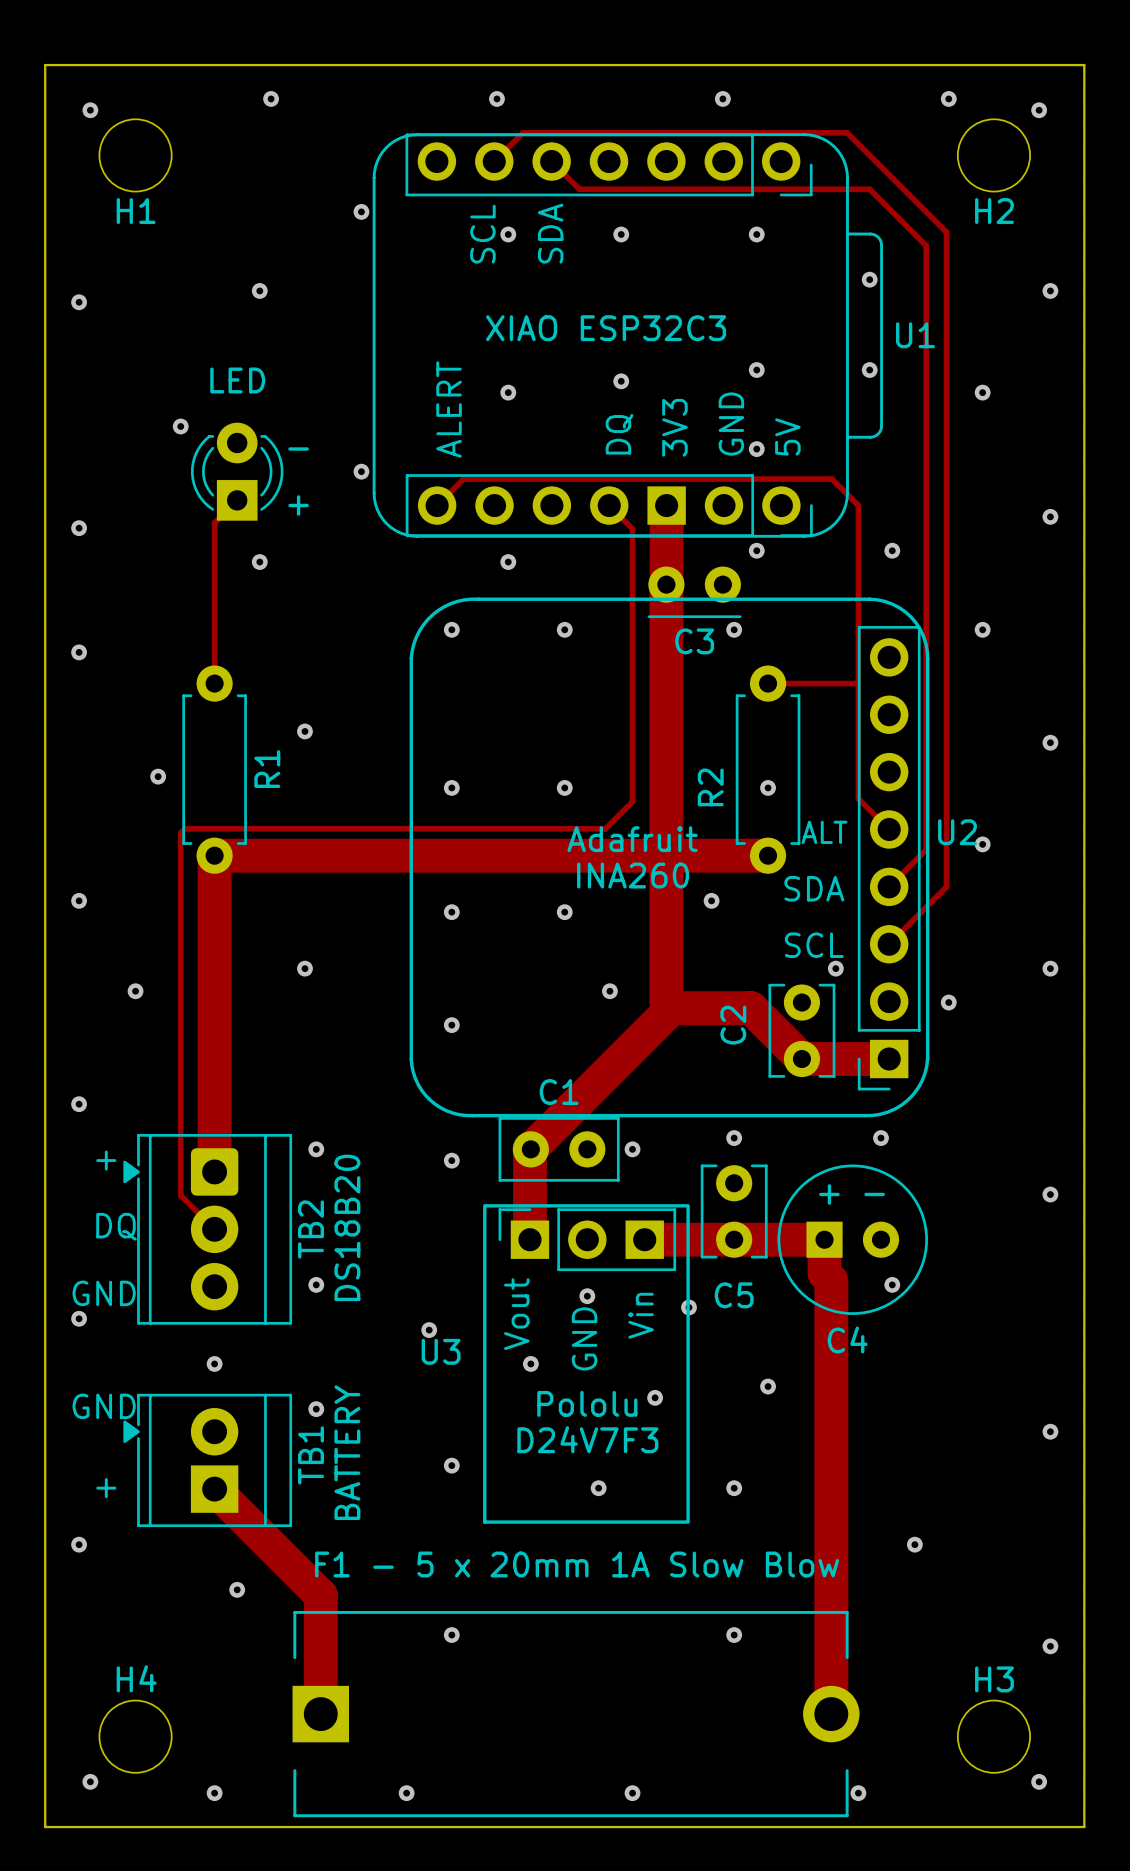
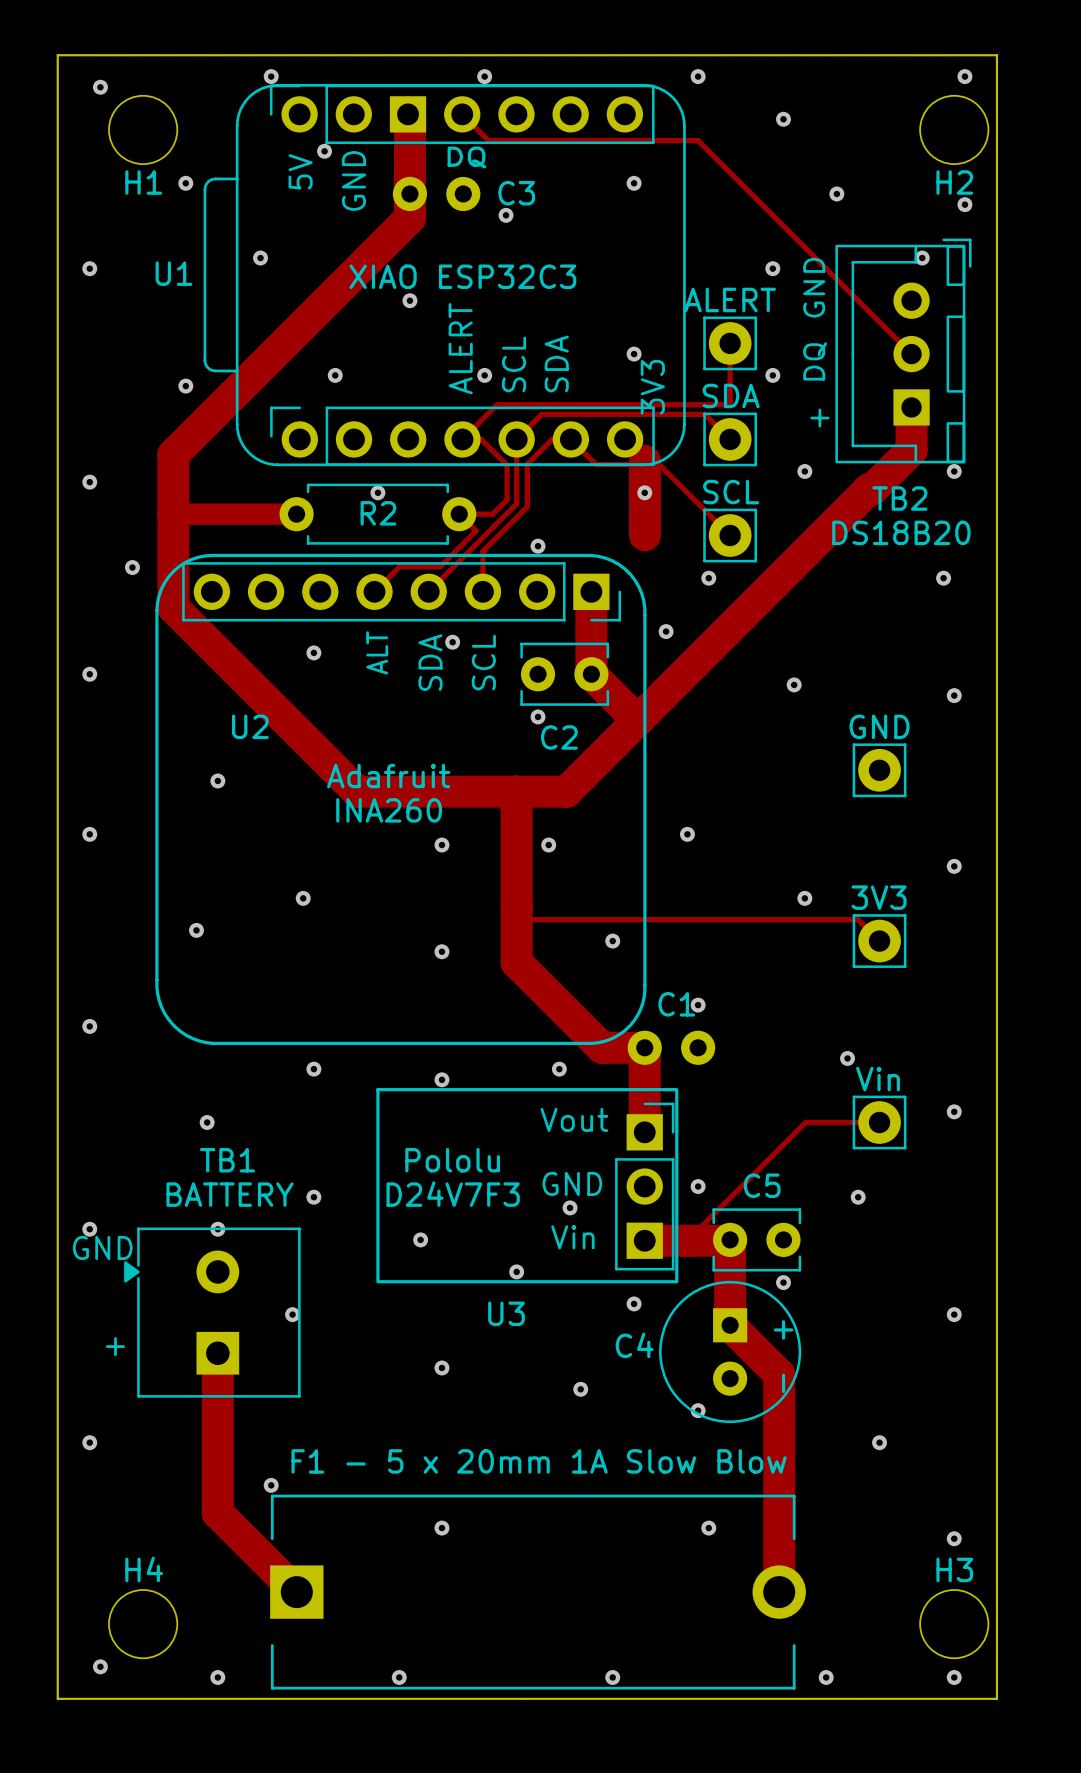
board edge: (45, 76) (45, 65) (1084, 65) (1084, 1827) (45, 1827) (45, 1815) -> (57, 55) (996, 55) (996, 1698) (57, 1698)
via: (948, 98) -> none
via: none -> (964, 76)
via: (1039, 110) -> none
U1 footprint: [372, 133, 884, 538] -> [203, 83, 686, 467]
track: none -> (462, 114) (488, 140) (698, 140) (911, 354)
via: none -> (783, 119)
track: (494, 161) (522, 132) (847, 132) (946, 232) (946, 886) (889, 944) -> none
track: (551, 161) (579, 189) (869, 189) (926, 245) (926, 849) (889, 886) -> none
text: none -> DQ (466, 157)
text: none -> GND (353, 180)
via: none -> (185, 183)
via position: (361, 211) -> (324, 151)
via: none -> (836, 193)
text position: SDA (550, 233) -> SDA (556, 363)
text position: SCL (482, 234) -> SCL (514, 364)
via position: (508, 234) -> (506, 215)
via position: (621, 234) -> (634, 183)
via: (756, 234) -> none
via: none -> (964, 204)
via: (869, 279) -> none
via: none -> (922, 258)
via: (1050, 290) -> none
via: none -> (772, 268)
U1 name position: U1 (915, 335) -> U1 (173, 273)
via: none -> (409, 300)
via: (756, 370) -> none
via: (869, 370) -> none
via position: (621, 381) -> (634, 354)
track: none -> (730, 343) (730, 402) (727, 404) (497, 404) (462, 439) (481, 439) (507, 465) (507, 499) (492, 514) (459, 514) (476, 530) (440, 566) (399, 566) (374, 591)
ALERT: none -> (730, 343)
part: none -> (903, 350)
via position: (508, 392) -> (484, 375)
via: (982, 392) -> none
text: none -> DQ (815, 361)
text position: ALERT (449, 409) -> ALERT (460, 348)
via: none -> (335, 375)
via: none -> (772, 375)
text position: GND (731, 424) -> GND (814, 287)
text: DQ (619, 434) -> none
text position: 5V (787, 436) -> 5V (300, 171)
text: - (298, 449) -> none
via: (756, 449) -> none
text: none -> + (819, 418)
LED: (237, 471) -> none
via: (361, 471) -> none
track: none -> (730, 439) (705, 414) (541, 414) (516, 439) (516, 503) (428, 591)
SDA: none -> (730, 439)
track: (237, 500) (214, 522) (214, 686) -> none
text: + (298, 505) -> none
track: (437, 505) (463, 479) (831, 479) (858, 505) (858, 798) (889, 829) -> none
track: (609, 505) (632, 528) (632, 801) (605, 828) (185, 828) (180, 833) (180, 1195) (214, 1229) -> none
via: none -> (804, 471)
via: none -> (954, 471)
via: (1050, 516) -> none
via: none -> (377, 492)
via: none -> (644, 492)
text: none -> TB2 (899, 498)
via: (756, 550) -> none
via: (892, 550) -> none
track: none -> (173, 514) (296, 514)
via: (259, 562) -> none
via: (508, 562) -> none
C3 footprint: [647, 566, 742, 619] -> [392, 176, 481, 212]
text: none -> DS18B20 (901, 532)
track: (666, 584) (666, 1002) (672, 1008) -> none
track: none -> (730, 535) (659, 464) (595, 464) (570, 439) (552, 439) (527, 464) (527, 506) (482, 551) (482, 591)
SCL: none -> (730, 535)
via: none -> (538, 546)
via: none -> (132, 567)
via: (451, 629) -> none
via: (564, 629) -> none
C3 name position: C3 (694, 641) -> C3 (516, 193)
track: none -> (591, 591) (591, 674) (637, 720)
via: (79, 652) -> none
track: (768, 683) (857, 683) -> none
via: none -> (666, 631)
via: none -> (452, 642)
text: none -> SDA (430, 662)
text: none -> SCL (483, 662)
via: none -> (89, 674)
via position: (304, 731) -> (313, 652)
via: none -> (794, 684)
via: (1050, 742) -> none
via: none -> (954, 695)
R1: (214, 769) -> none
R2 rotation: 0° (768, 769) -> 90° clockwise (377, 514)
R2 position: (768, 769) -> (377, 514)
via: (158, 776) -> none
via: (451, 787) -> none
via position: (564, 787) -> (538, 716)
R2 name position: R2 (710, 787) -> R2 (378, 513)
via: (768, 787) -> none
text rotation: 0° (824, 832) -> 90° counterclockwise (377, 652)
text position: ALT (824, 832) -> ALT (377, 652)
U2 name position: U2 (957, 832) -> U2 (250, 726)
GND: none -> (879, 770)
text position: Adafruit (632, 839) -> Adafruit (388, 776)
via: none -> (217, 780)
via: (982, 844) -> none
track: (362, 855) (214, 855) (214, 1171) -> (357, 791) (173, 607) (173, 454) (409, 218) (409, 116)
track: none -> (516, 791) (516, 962) (602, 1047) (644, 1047) (644, 1132)
track: (583, 855) (768, 855) -> (566, 791) (868, 489) (872, 489) (911, 450) (911, 407)
U2 rotation: 0° (669, 857) -> 90° counterclockwise (400, 799)
text position: INA260 (633, 875) -> INA260 (389, 810)
text: SDA (814, 888) -> none
via: none -> (954, 866)
text: SCL (814, 945) -> none
via: (1050, 968) -> none
track: none -> (516, 909) (527, 919) (858, 919) (879, 941)
via position: (135, 991) -> (196, 930)
via position: (609, 991) -> (612, 941)
via: (948, 1002) -> none
track: (672, 1008) (751, 1008) (801, 1059) (889, 1059) -> none
track: (672, 1008) (530, 1149) -> none
3V3: none -> (879, 941)
C2 name position: C2 (733, 1025) -> C2 (559, 737)
C2 rotation: 0° (801, 1030) -> 90° clockwise (564, 674)
C2 position: (801, 1030) -> (564, 674)
via: none -> (698, 1005)
C1 footprint: [498, 1117, 620, 1182] -> [627, 1030, 716, 1065]
via: (734, 1138) -> none
via: none -> (559, 1069)
via: (632, 1149) -> none
track: (529, 1150) (529, 1239) -> none
text: + (106, 1160) -> none
text rotation: 0° (829, 1194) -> 90° clockwise (783, 1329)
text position: + (829, 1194) -> + (783, 1329)
text rotation: 0° (874, 1194) -> 90° clockwise (783, 1383)
text position: - (874, 1194) -> - (783, 1383)
via position: (1050, 1194) -> (954, 1111)
via: none -> (207, 1122)
track: none -> (879, 1122) (805, 1122) (687, 1240)
Vin: none -> (879, 1122)
C5 rotation: 0° (734, 1211) -> 90° clockwise (756, 1239)
C5 position: (734, 1211) -> (756, 1239)
text: DQ (116, 1226) -> none
text: DS18B20 (347, 1227) -> none
part: (207, 1229) -> none
text: TB2 (311, 1229) -> none
track: (644, 1239) (824, 1239) (824, 1273) -> none
C4 rotation: 0° (852, 1239) -> 90° clockwise (730, 1351)
C4 position: (852, 1239) -> (730, 1351)
track: (831, 1280) (831, 1714) -> none
text position: GND (104, 1293) -> GND (102, 1247)
C5 name position: C5 (734, 1295) -> C5 (762, 1185)
via position: (688, 1307) -> (698, 1186)
text rotation: 0° (516, 1314) -> 90° clockwise (574, 1119)
text position: Vout (516, 1314) -> Vout (574, 1119)
text rotation: 0° (641, 1315) -> 90° clockwise (572, 1237)
track: none -> (644, 1240) (718, 1240)
track: none -> (730, 1239) (730, 1325) (779, 1374) (779, 1592)
text rotation: 0° (584, 1338) -> 90° clockwise (572, 1183)
U3 name position: U3 (441, 1351) -> U3 (506, 1313)
via position: (214, 1363) -> (217, 1229)
U3 rotation: 0° (586, 1363) -> 90° clockwise (527, 1185)
via position: (768, 1386) -> (783, 1282)
text position: Pololu (587, 1403) -> Pololu (452, 1160)
text: GND (104, 1406) -> none
part: none -> (212, 1312)
via position: (316, 1409) -> (292, 1314)
via position: (1050, 1431) -> (954, 1314)
text position: D24V7F3 (587, 1439) -> D24V7F3 (453, 1194)
track: none -> (217, 1353) (217, 1513) (296, 1592)
text rotation: 0° (347, 1452) -> 90° clockwise (230, 1194)
text position: BATTERY (347, 1452) -> BATTERY (230, 1194)
text rotation: 0° (311, 1455) -> 90° clockwise (227, 1160)
text position: TB1 (311, 1455) -> TB1 (227, 1160)
part: (207, 1460) -> none
text position: + (106, 1488) -> + (115, 1346)
via position: (734, 1488) -> (698, 1410)
track: (214, 1489) (320, 1595) (320, 1714) -> none
text position: F1 - 5 x 20mm 1A Slow Blow (577, 1564) -> F1 - 5 x 20mm 1A Slow Blow (539, 1461)
via position: (237, 1589) -> (271, 1485)
via position: (1050, 1646) -> (954, 1538)
part position: (576, 1714) -> (538, 1592)
via position: (1039, 1781) -> (954, 1677)

